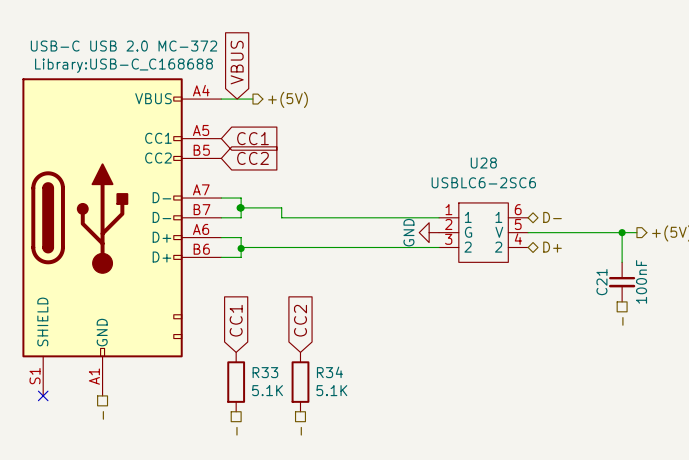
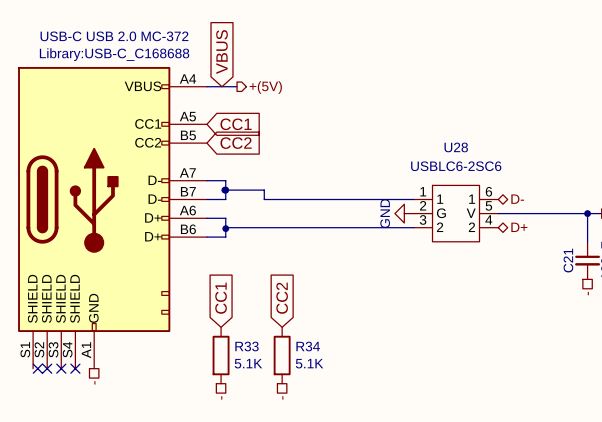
part symbol: [22, 78, 222, 396] -> [18, 66, 207, 369]
no-connect mark: none -> (47, 368)
no-connect mark: none -> (61, 368)
no-connect mark: none -> (75, 368)

